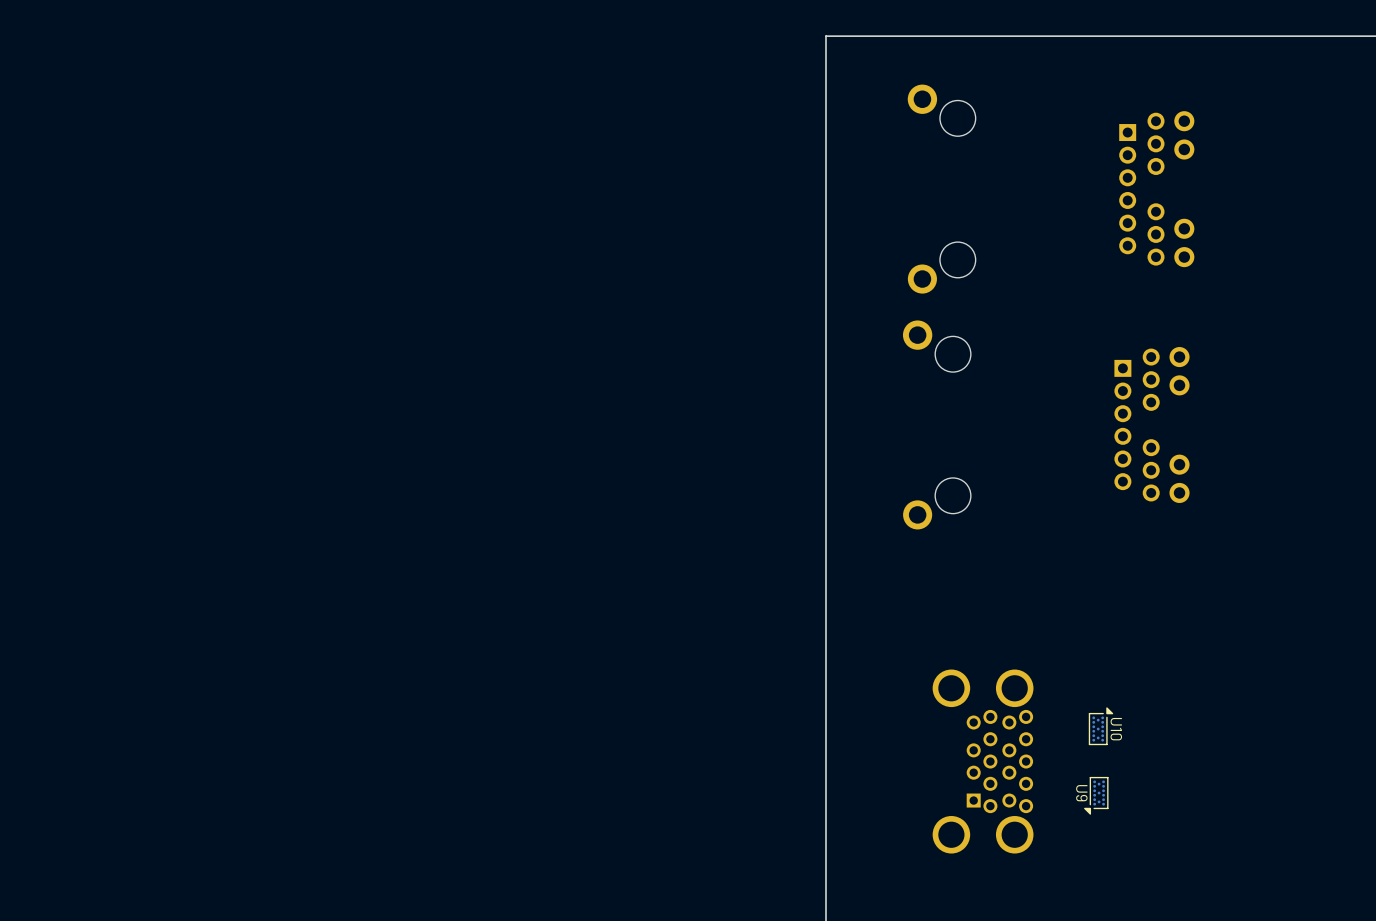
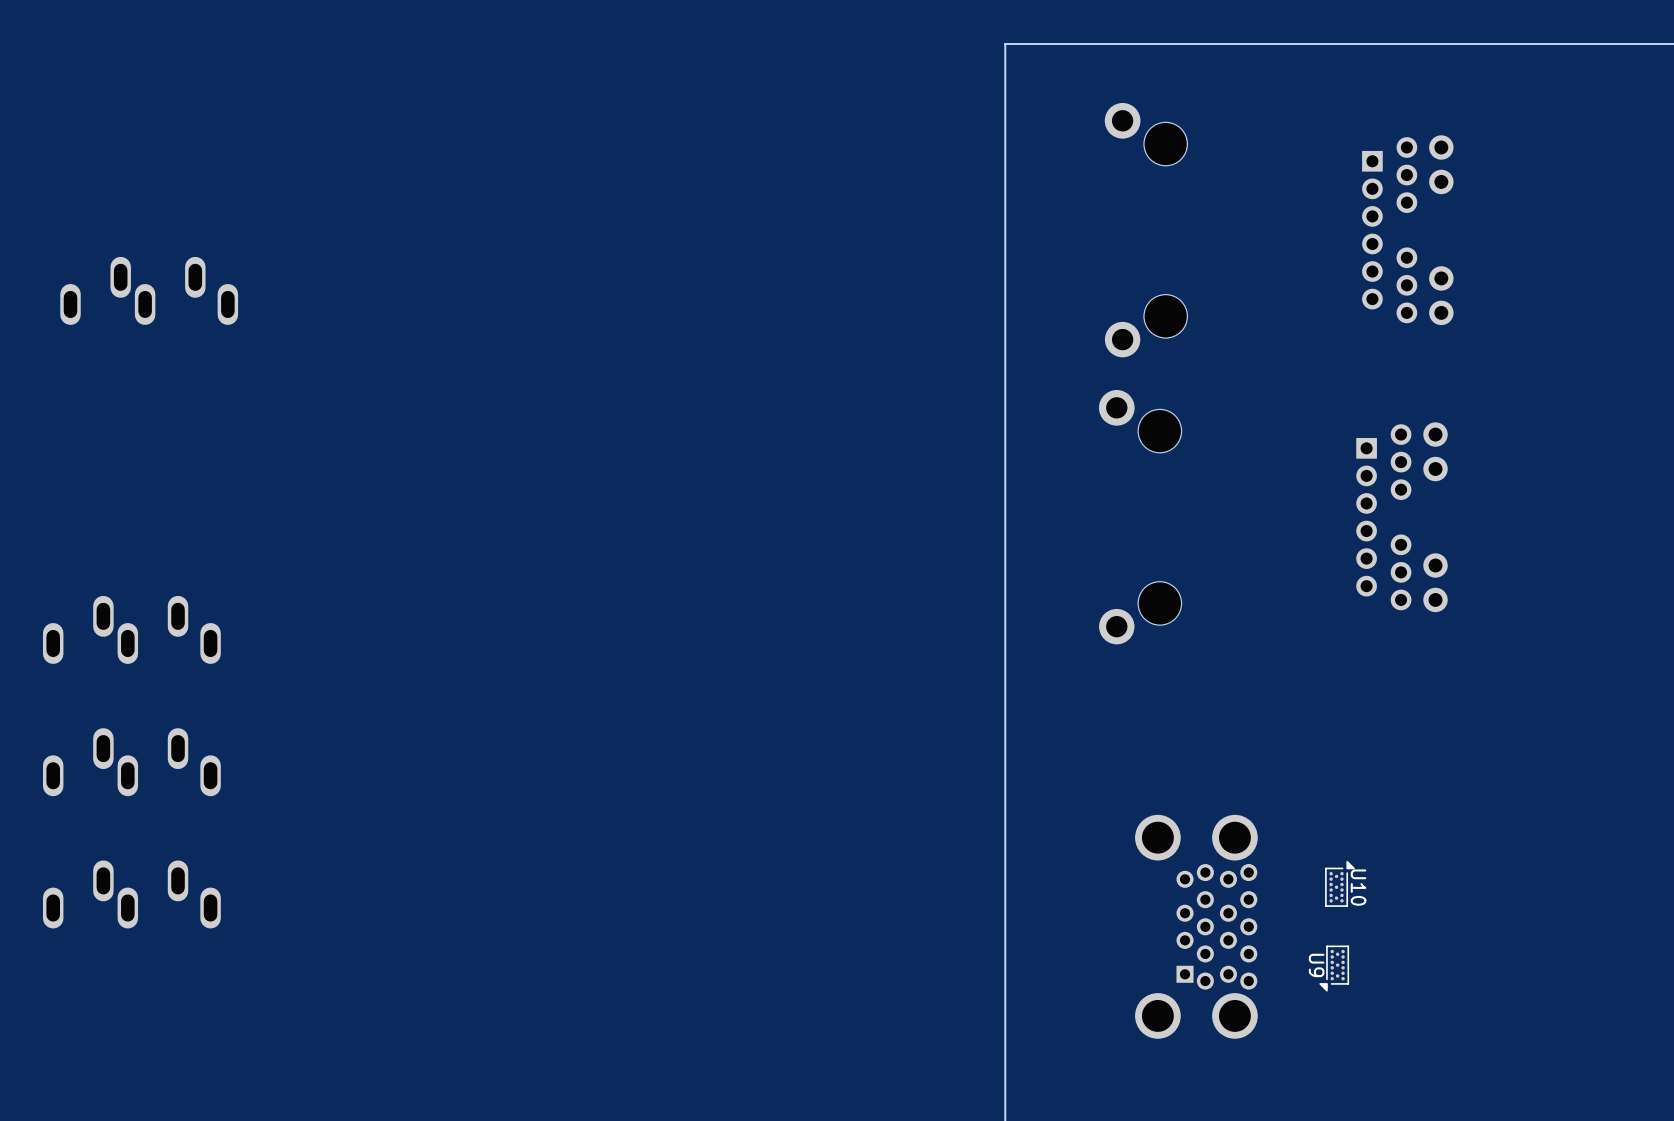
part: none -> (149, 290)
part: none -> (131, 629)
part: none -> (131, 762)
part: none -> (131, 894)

